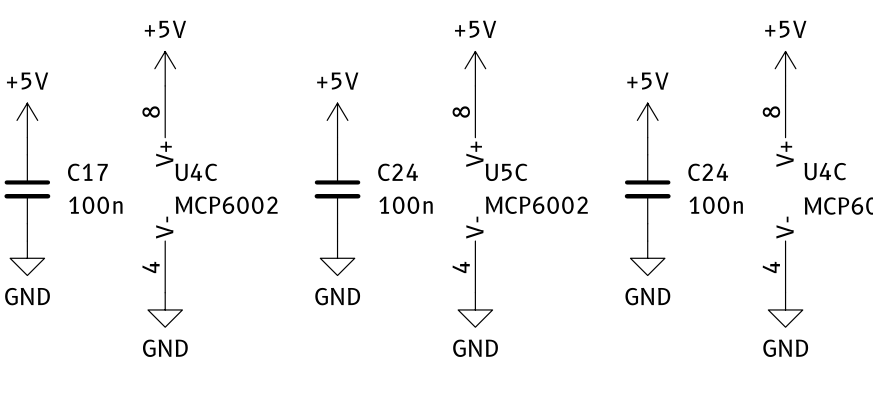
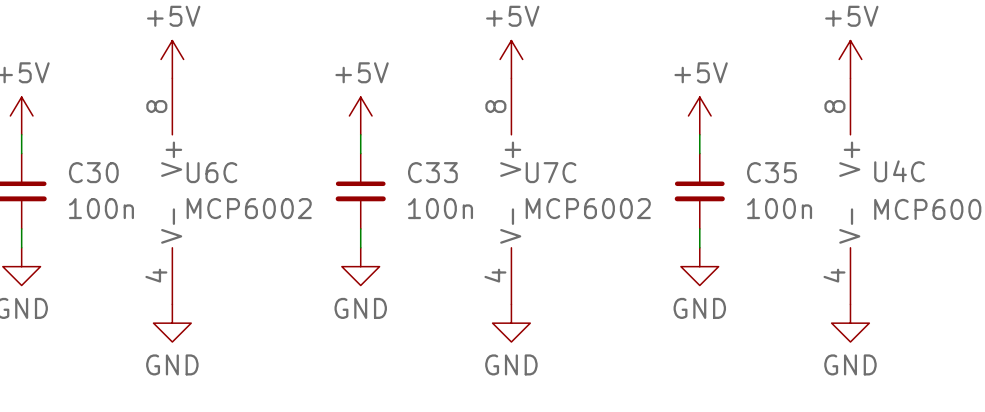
C17 name: C17 (87, 172) -> C30 (93, 172)
U4C name: U4C (196, 172) -> U6C (211, 172)
C24 name: C24 (398, 172) -> C33 (432, 172)
U5C name: U5C (506, 172) -> U7C (551, 172)
C24 name: C24 (708, 172) -> C35 (771, 172)

